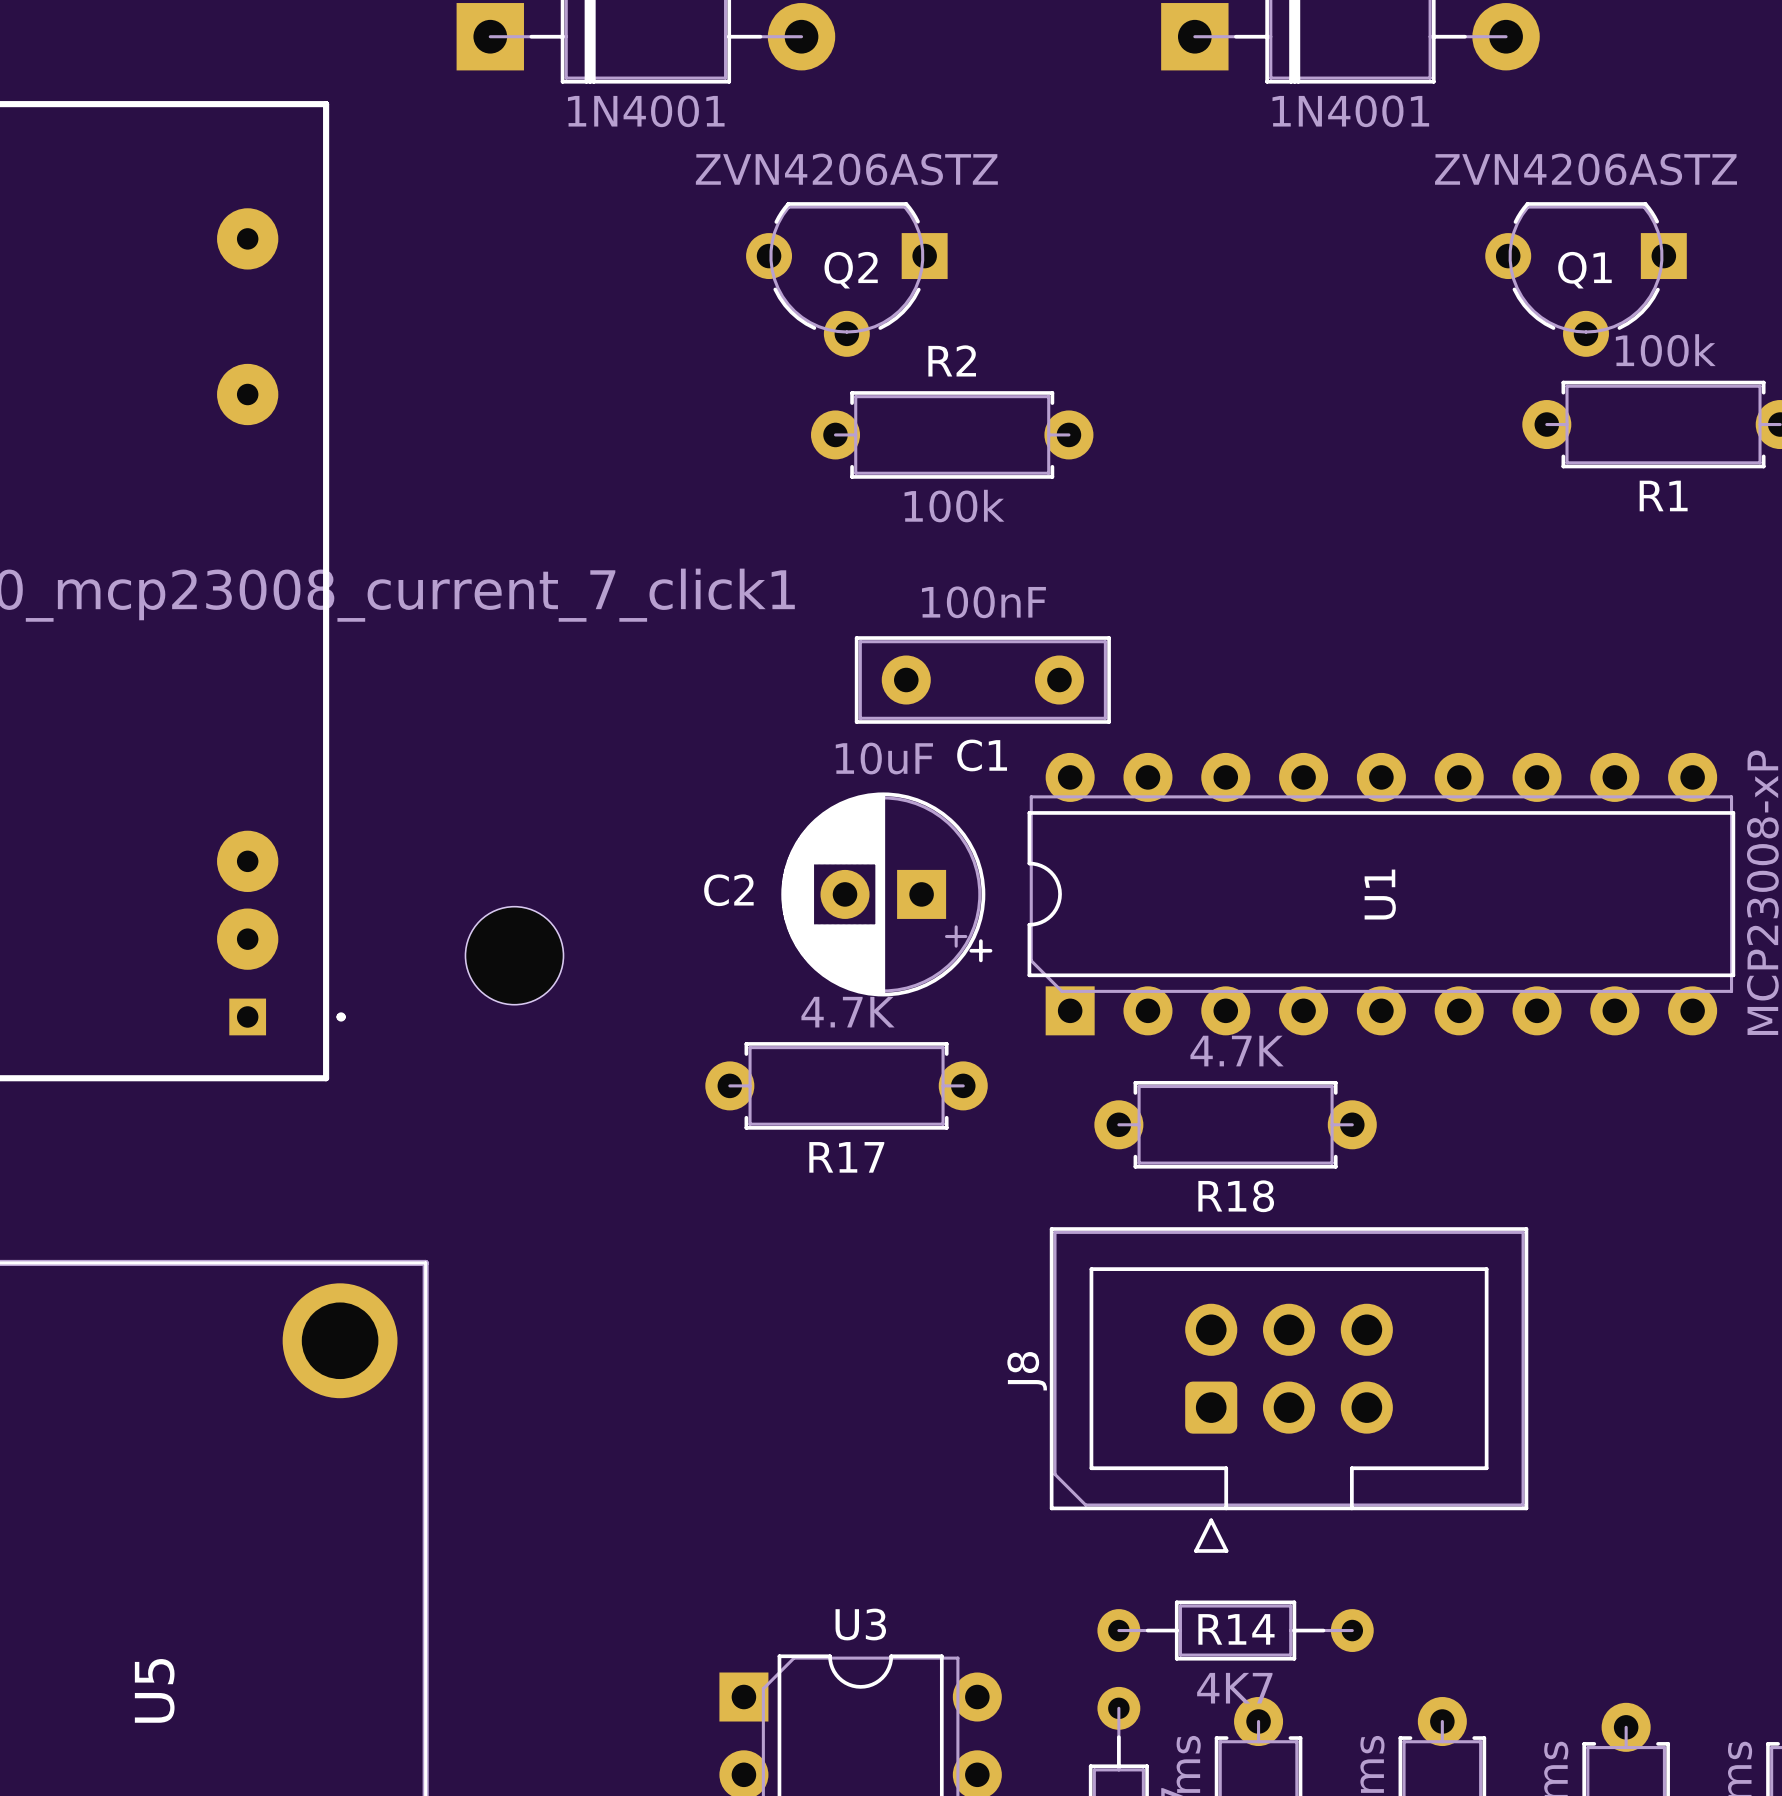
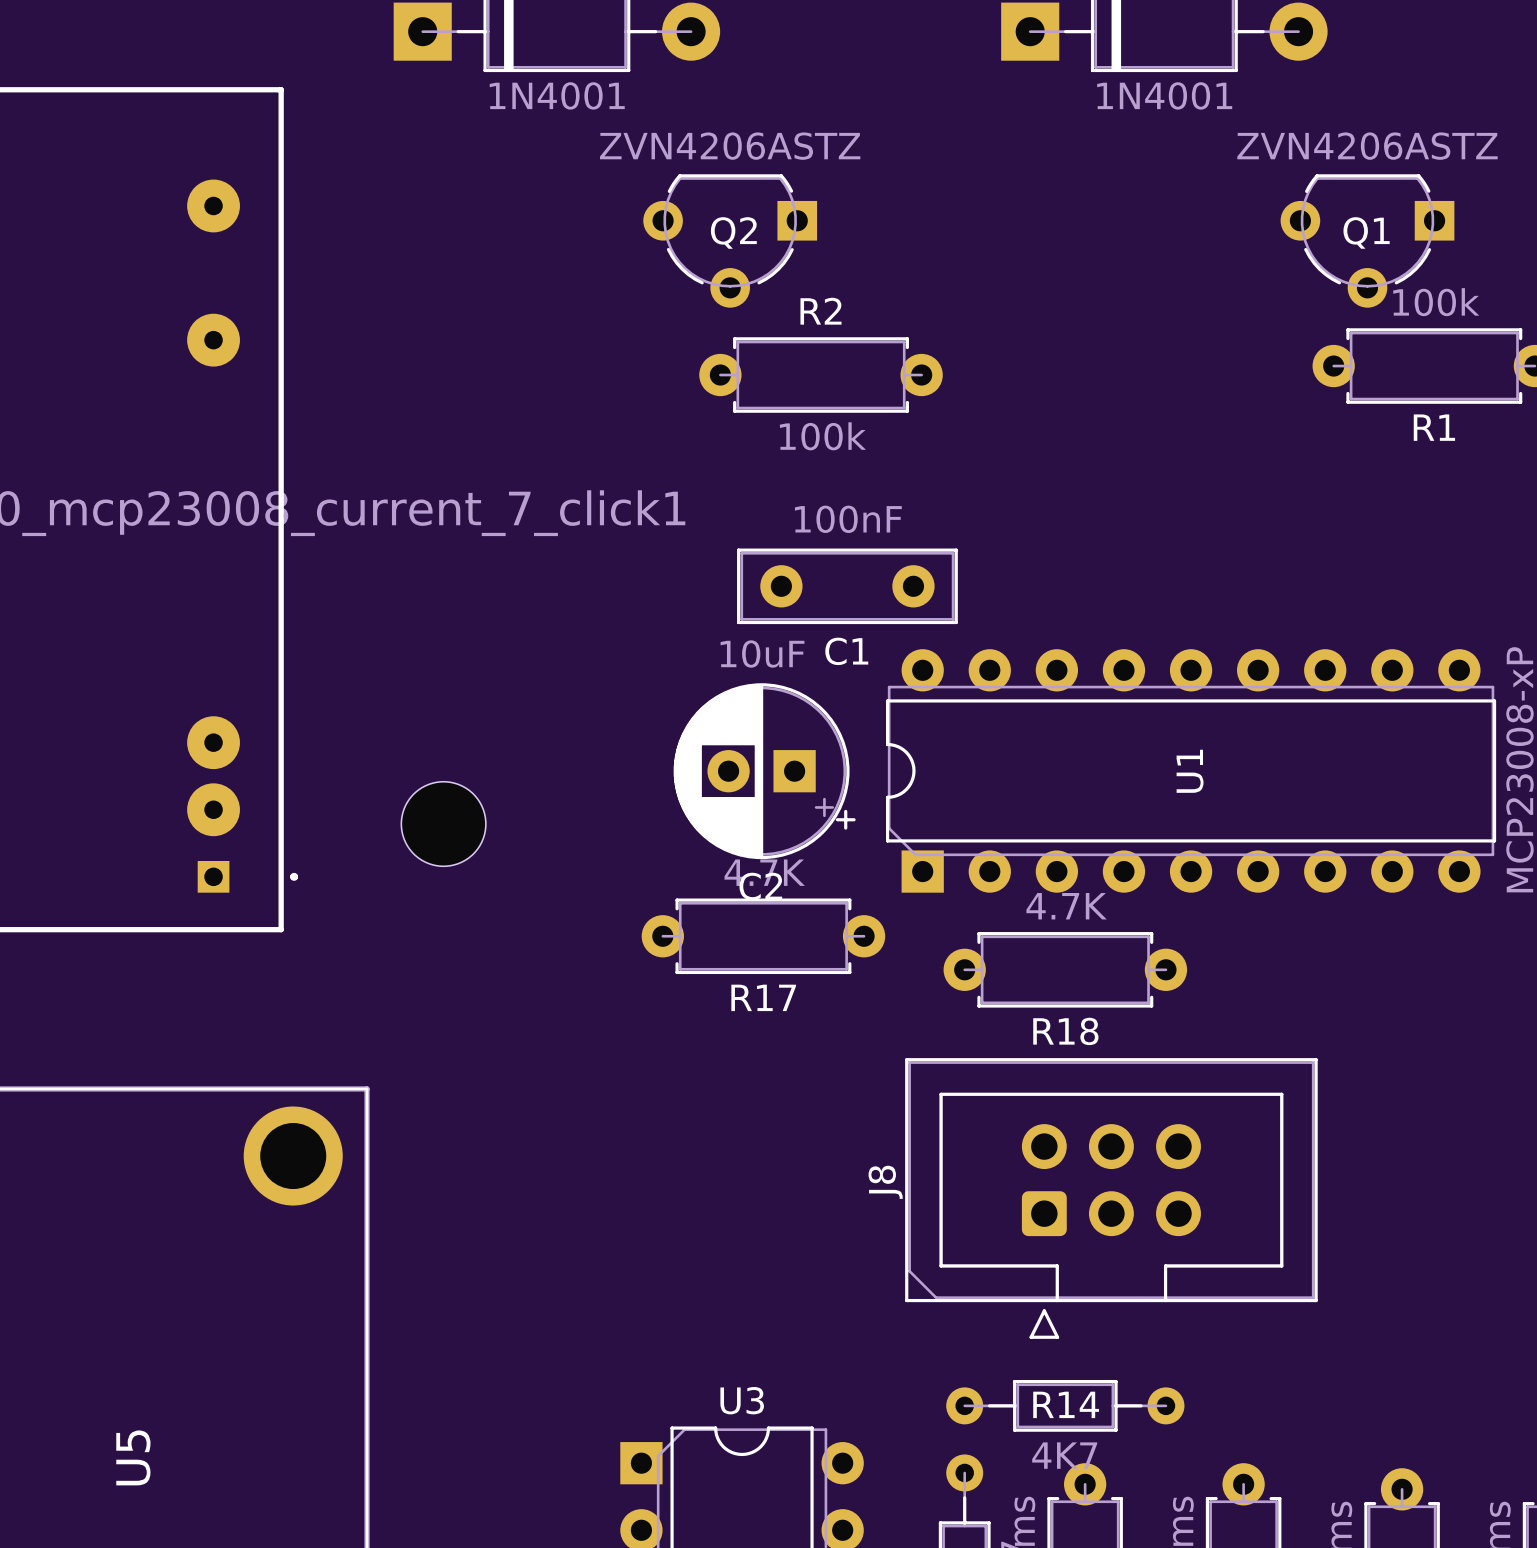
C2 name position: C2 (728, 890) -> C2 (760, 886)
R17 position: (846, 1085) -> (763, 936)

